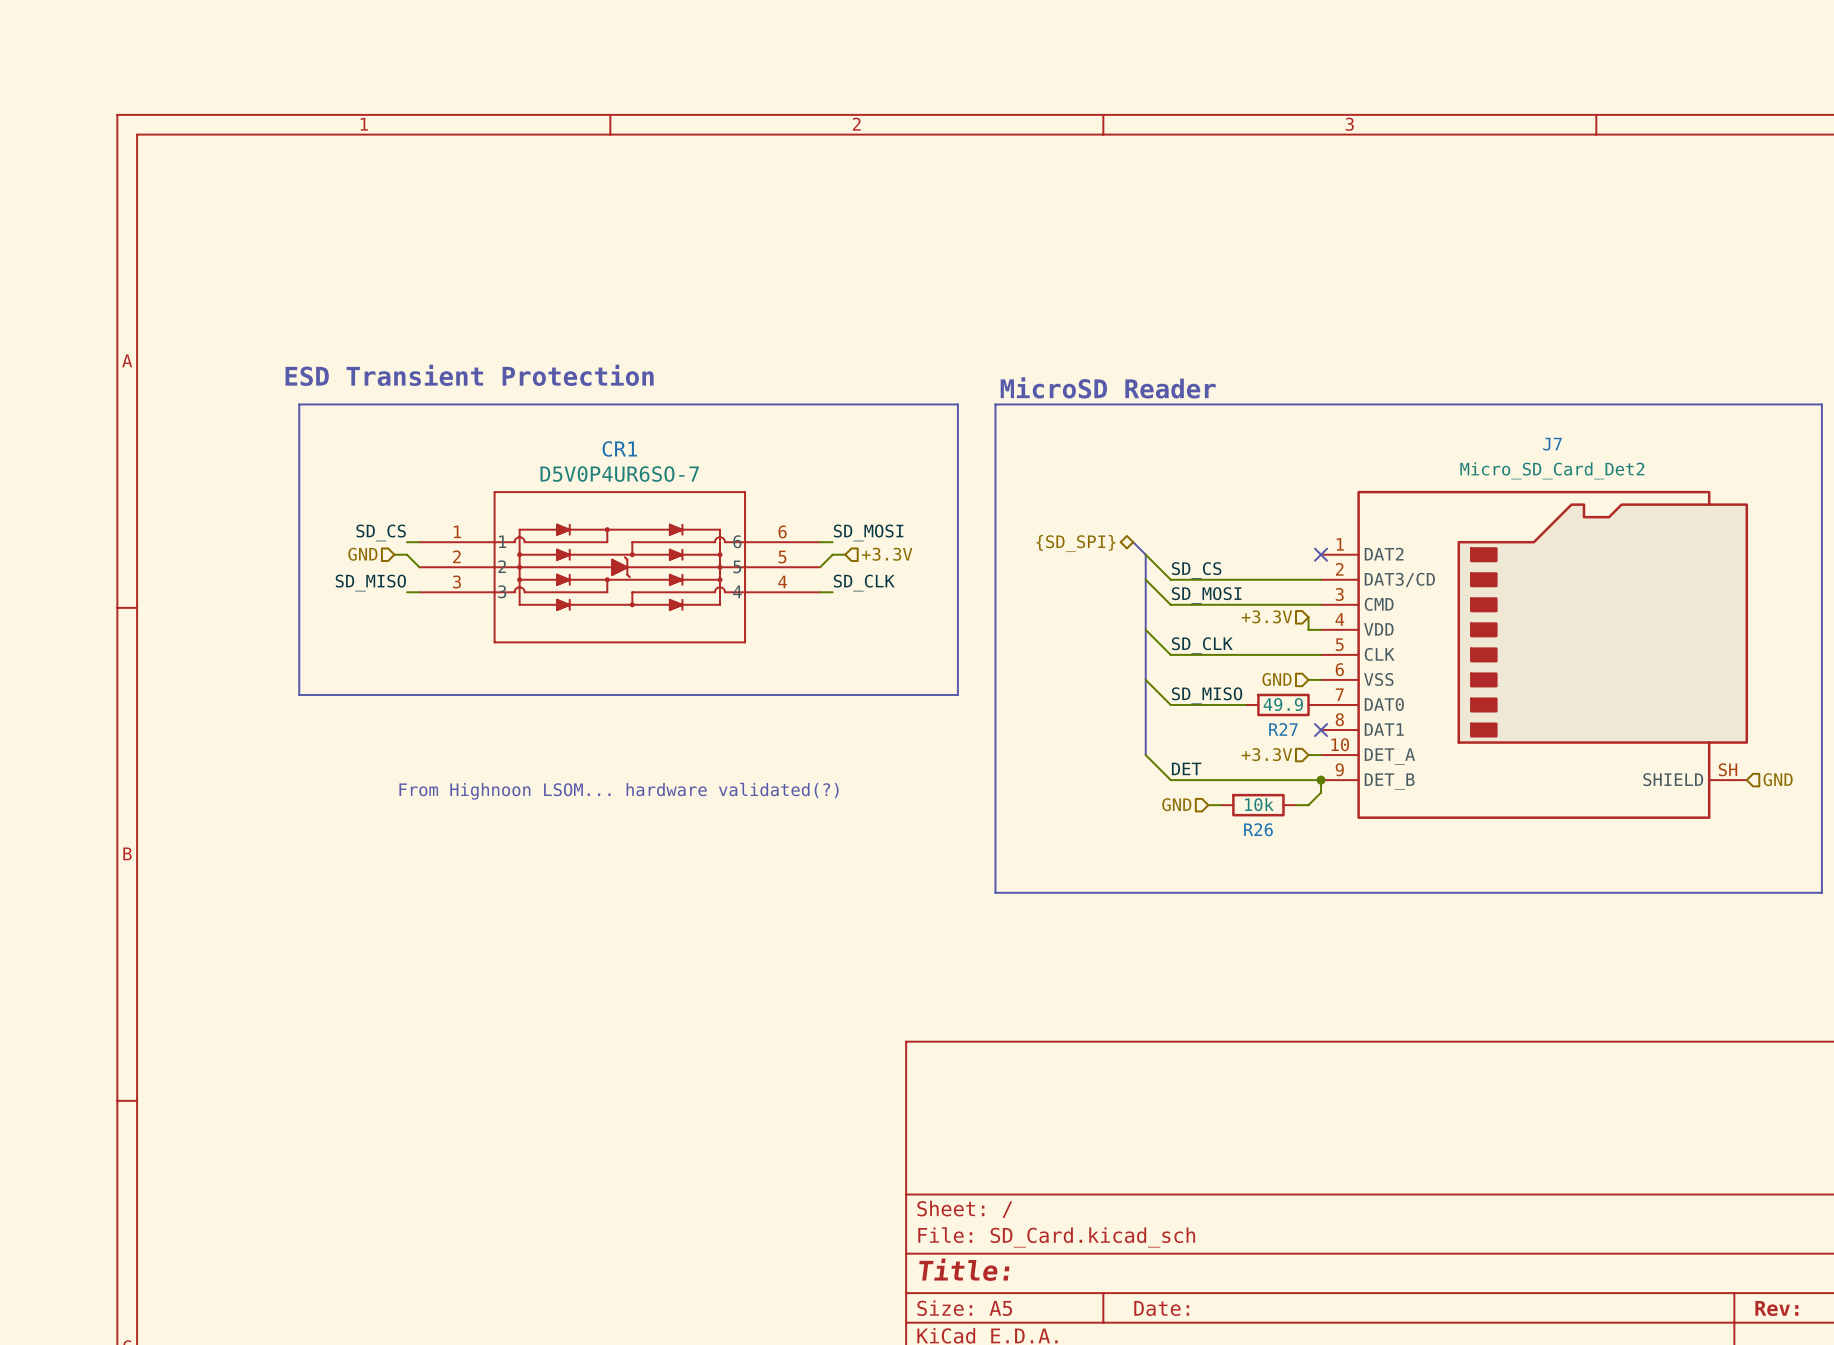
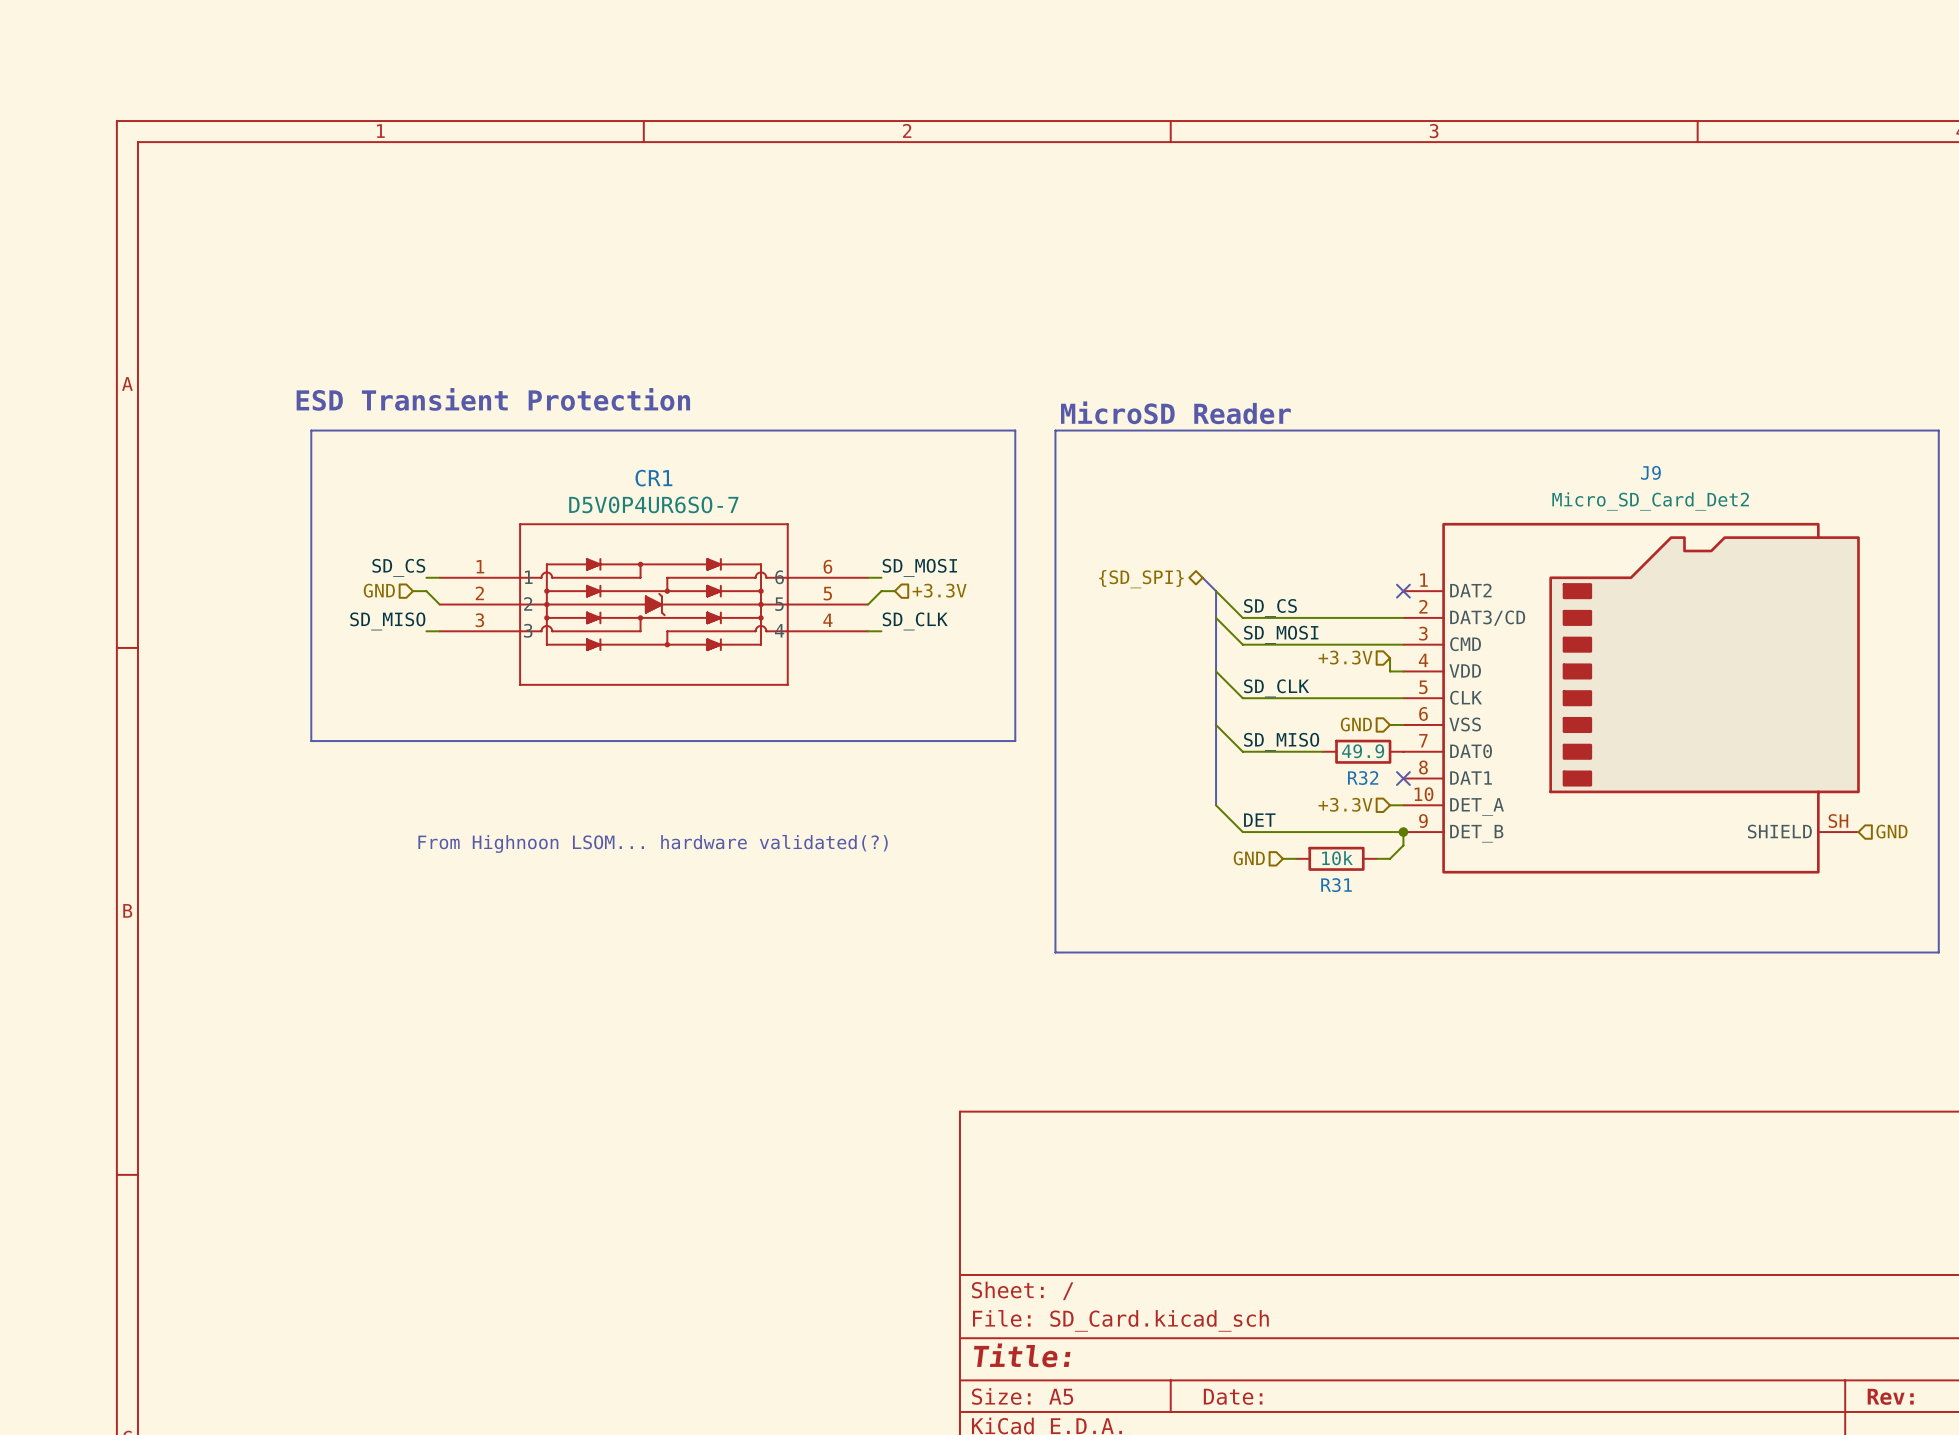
J7 name: J7 (1552, 444) -> J9 (1650, 472)
R27 name: R27 (1283, 729) -> R32 (1363, 778)
R26 name: R26 (1258, 829) -> R31 (1336, 885)

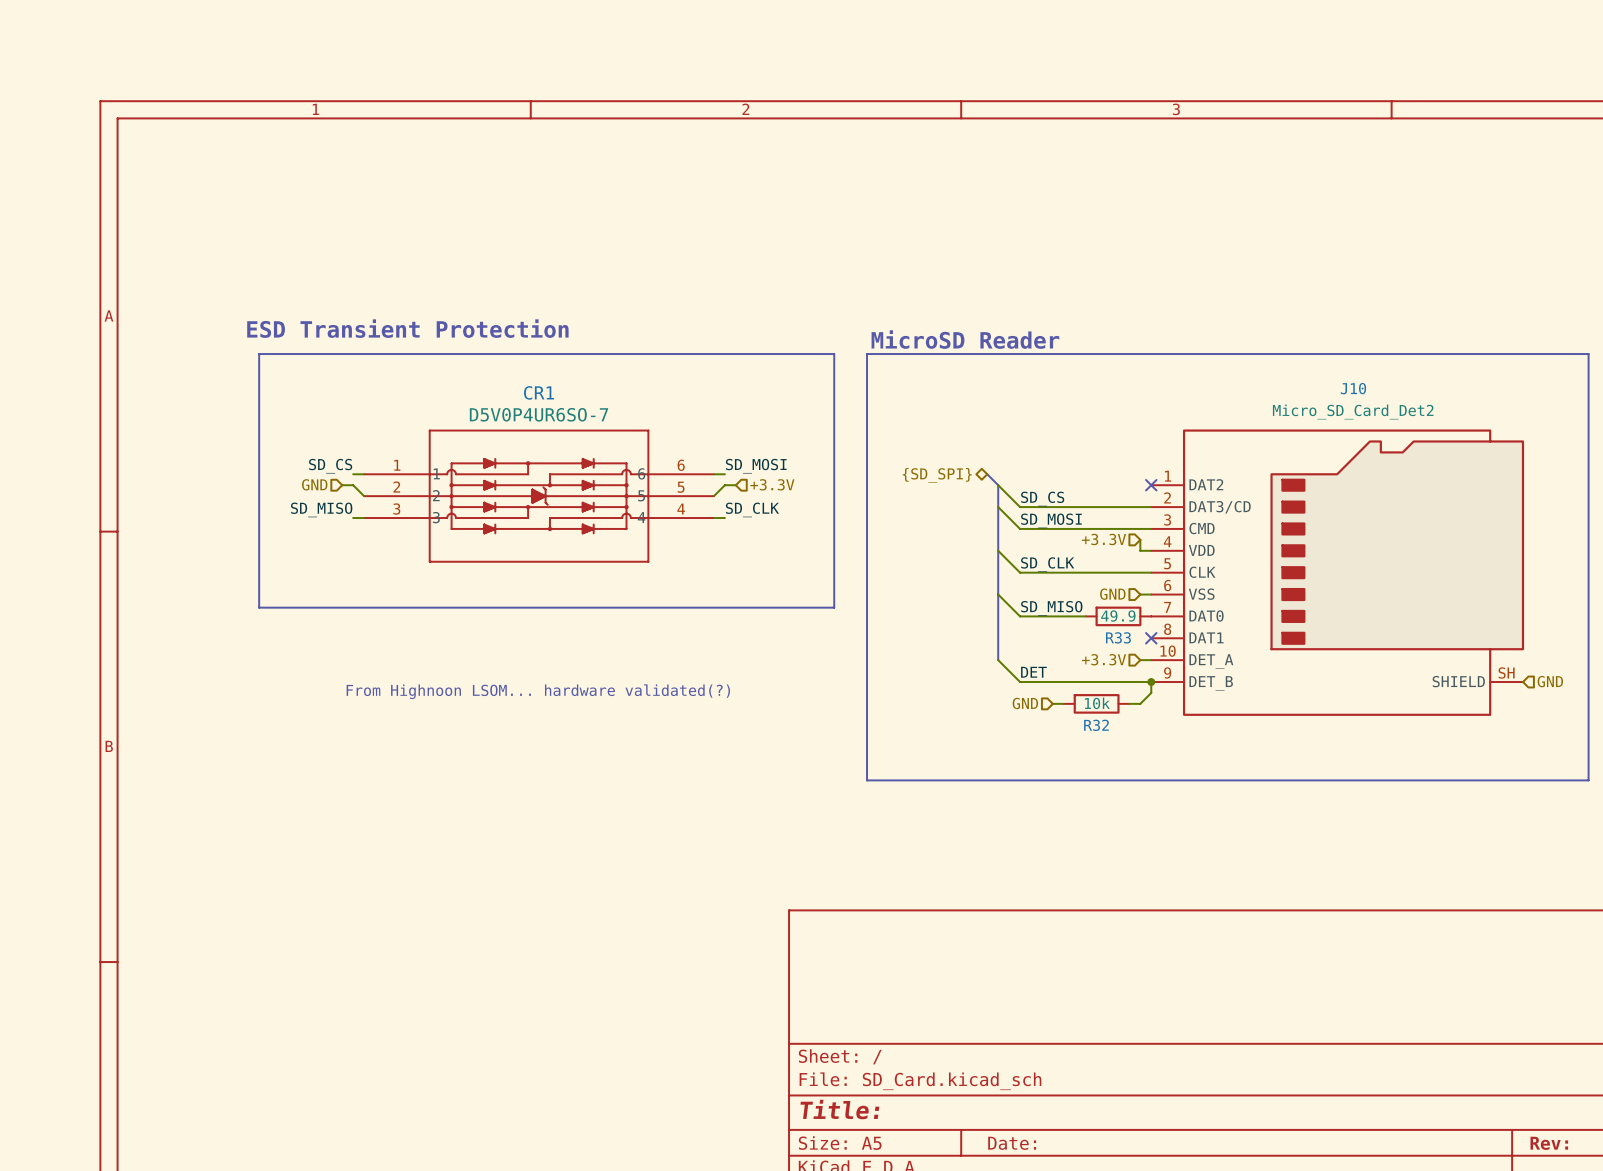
J9 name: J9 (1650, 472) -> J10 (1353, 388)
R32 name: R32 (1363, 778) -> R33 (1118, 637)
R31 name: R31 (1336, 885) -> R32 (1096, 725)

